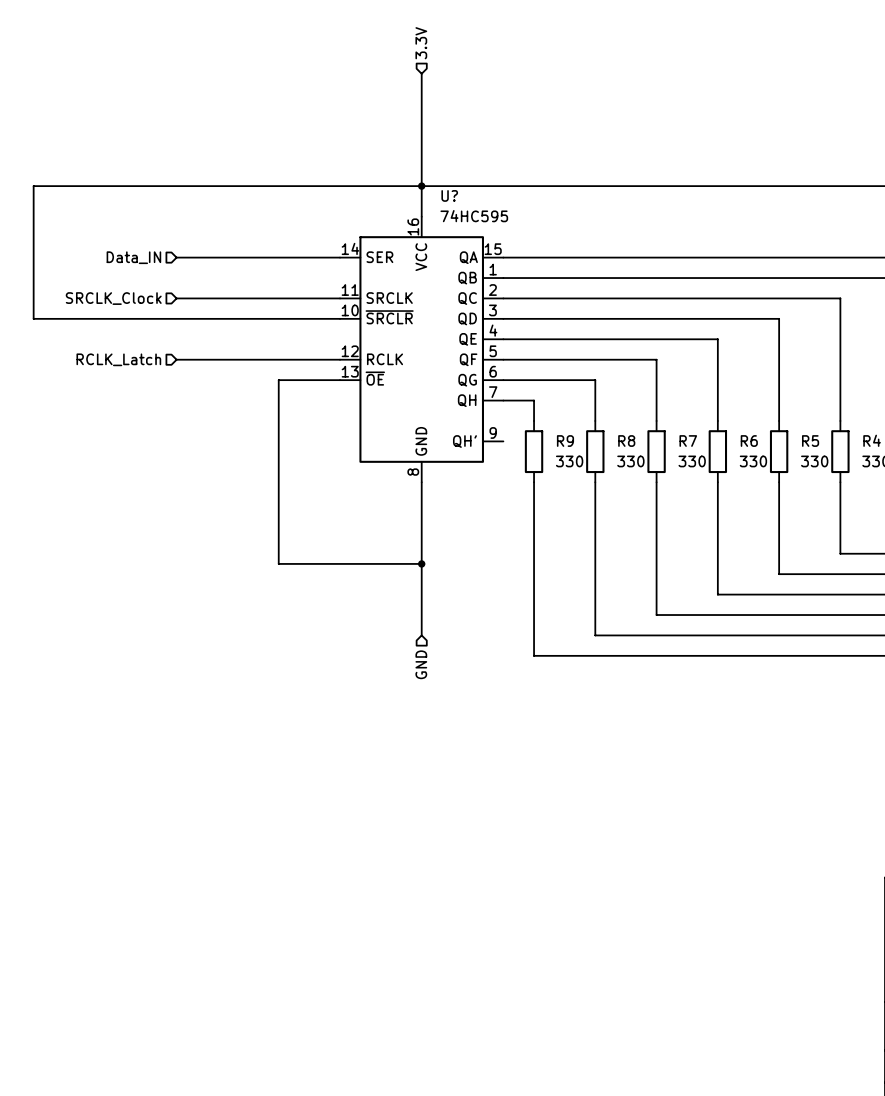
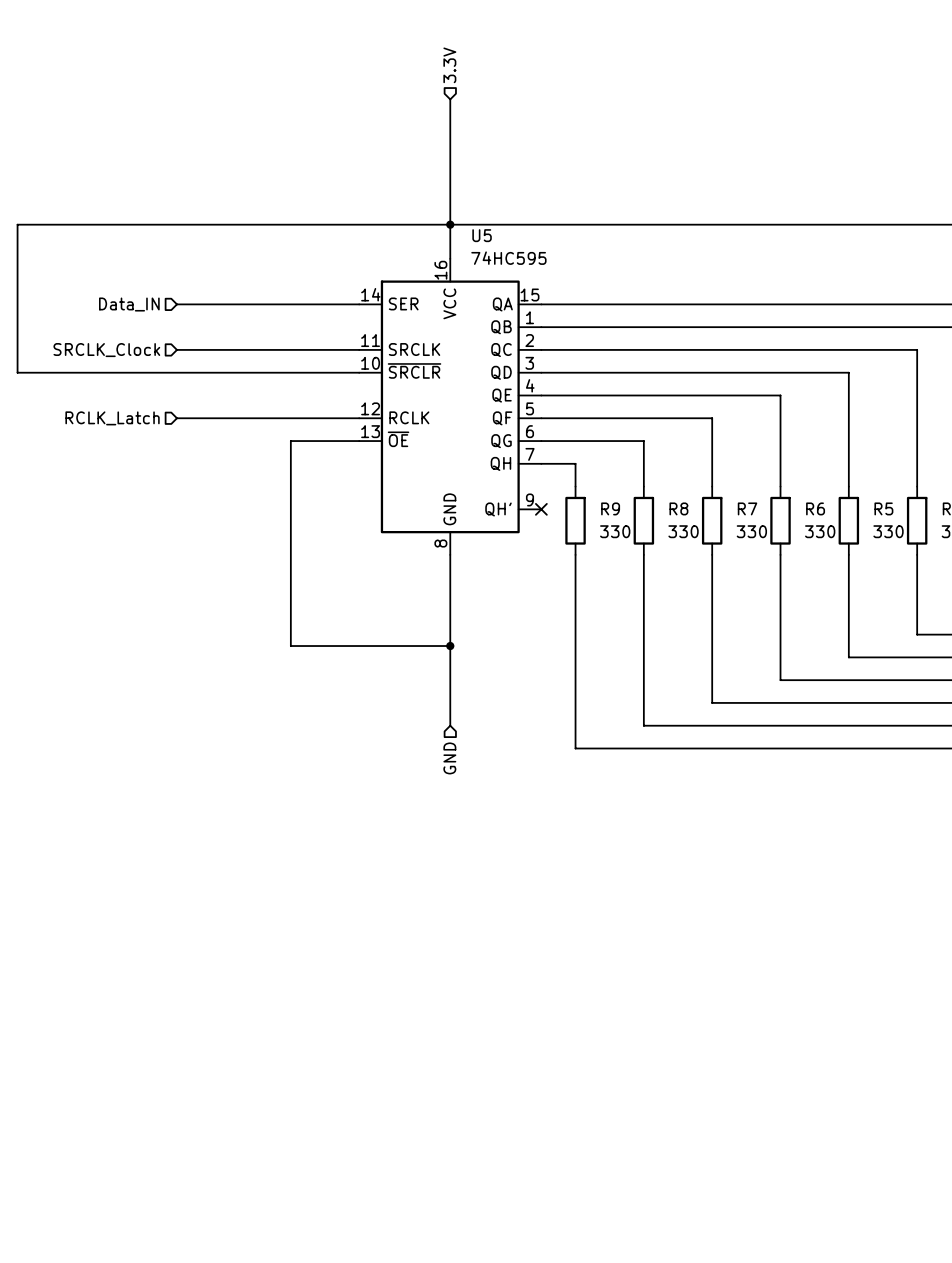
U? name: U? (449, 195) -> U5 (482, 235)
no-connect mark: none -> (541, 509)

